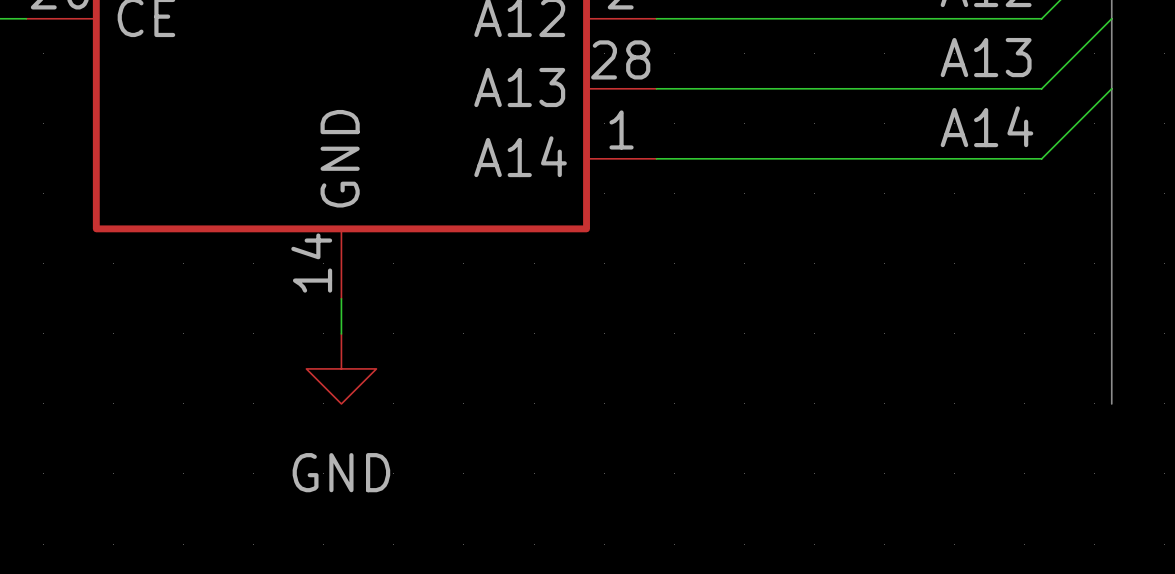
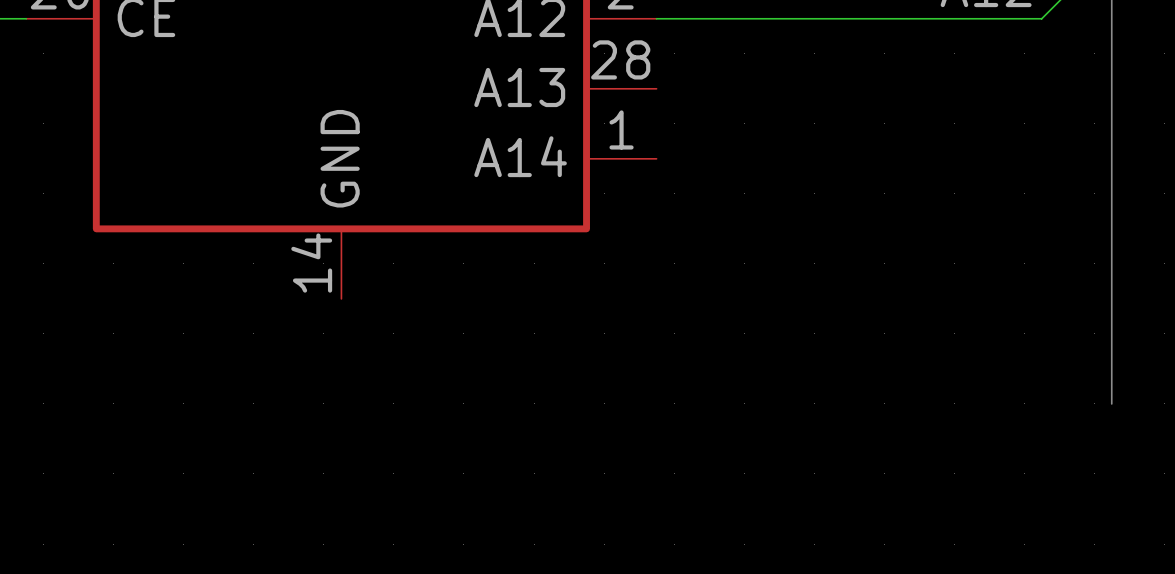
wire: (1111, 18) (1041, 88) (656, 88) -> none
label: A13 (986, 57) -> none
wire: (1111, 88) (1041, 158) (656, 158) -> none
label: A14 (986, 126) -> none
wire: (341, 298) (341, 333) -> none
power symbol: GND (341, 368) -> none

